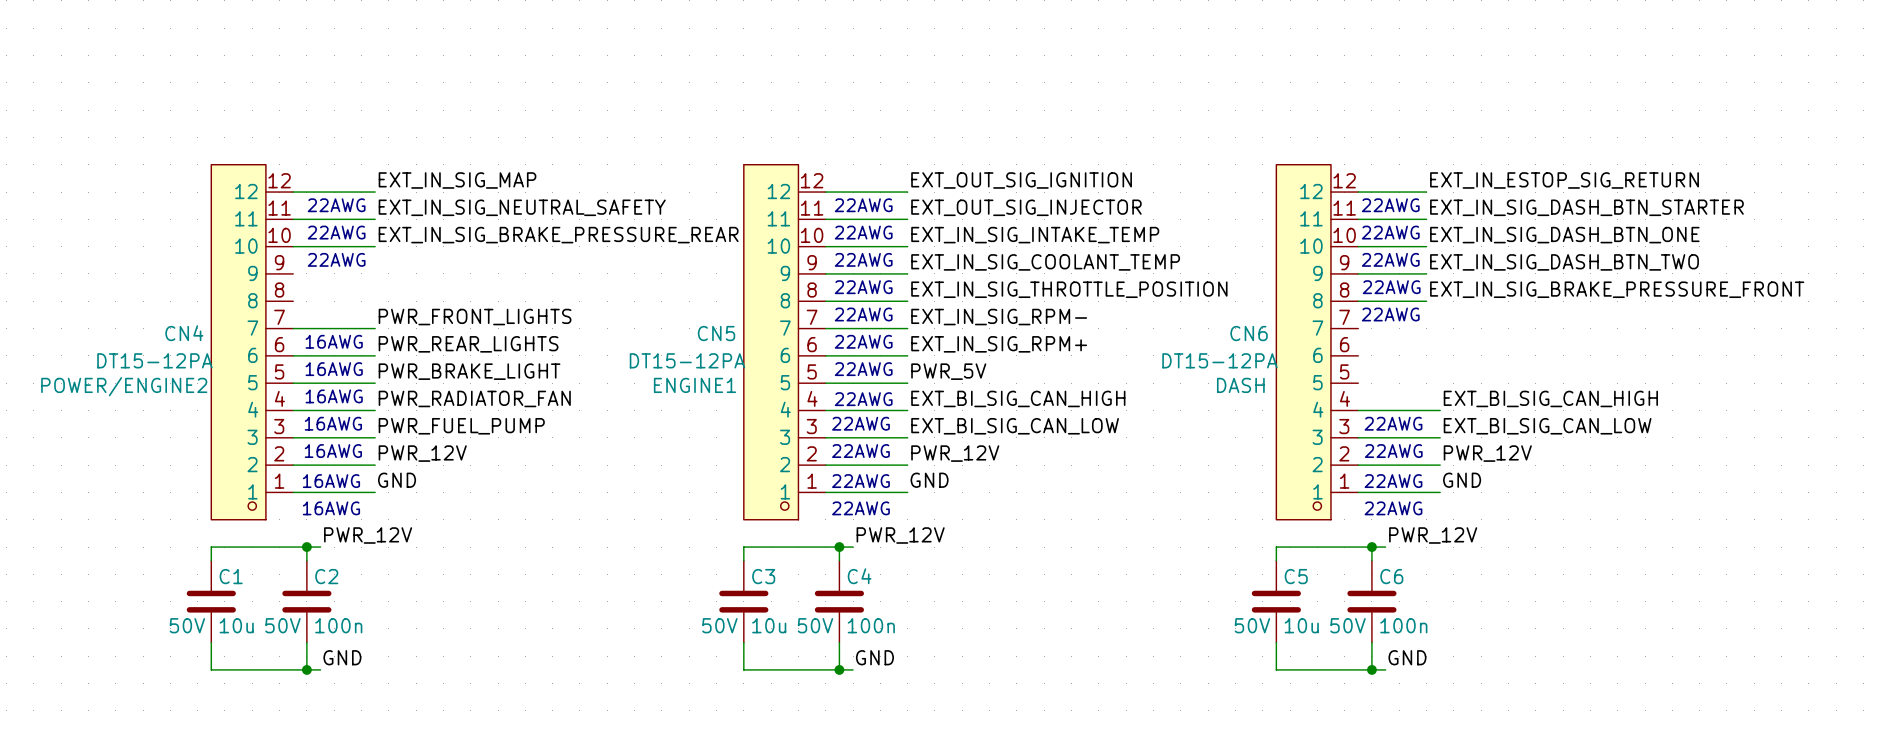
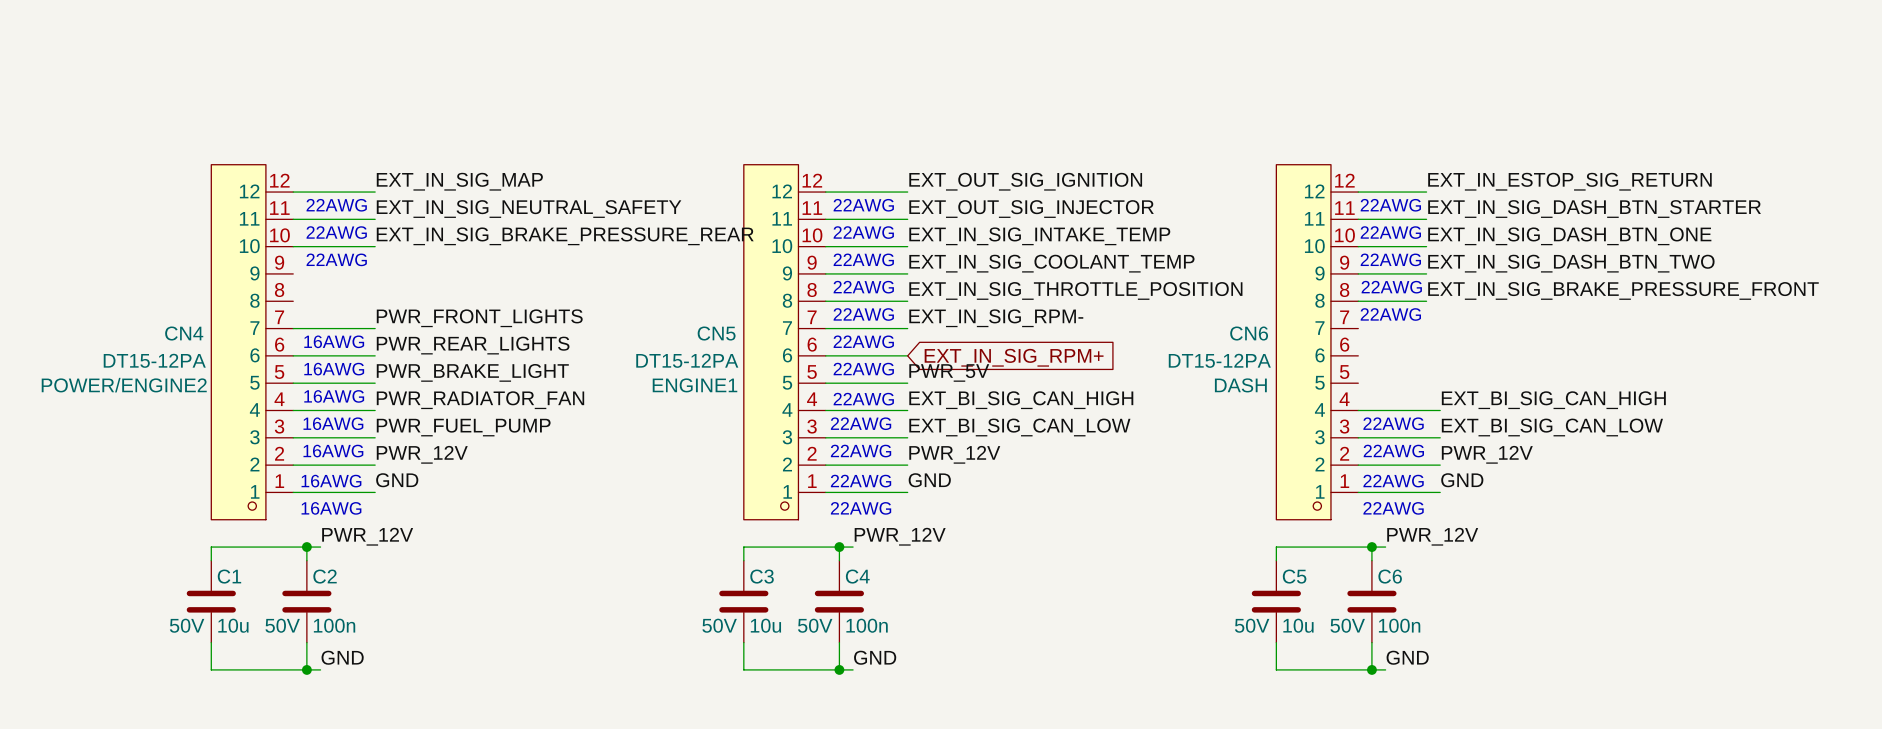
label: EXT_IN_SIG_RPM+ (999, 344) -> none
global label: none -> EXT_IN_SIG_RPM+ (1014, 357)

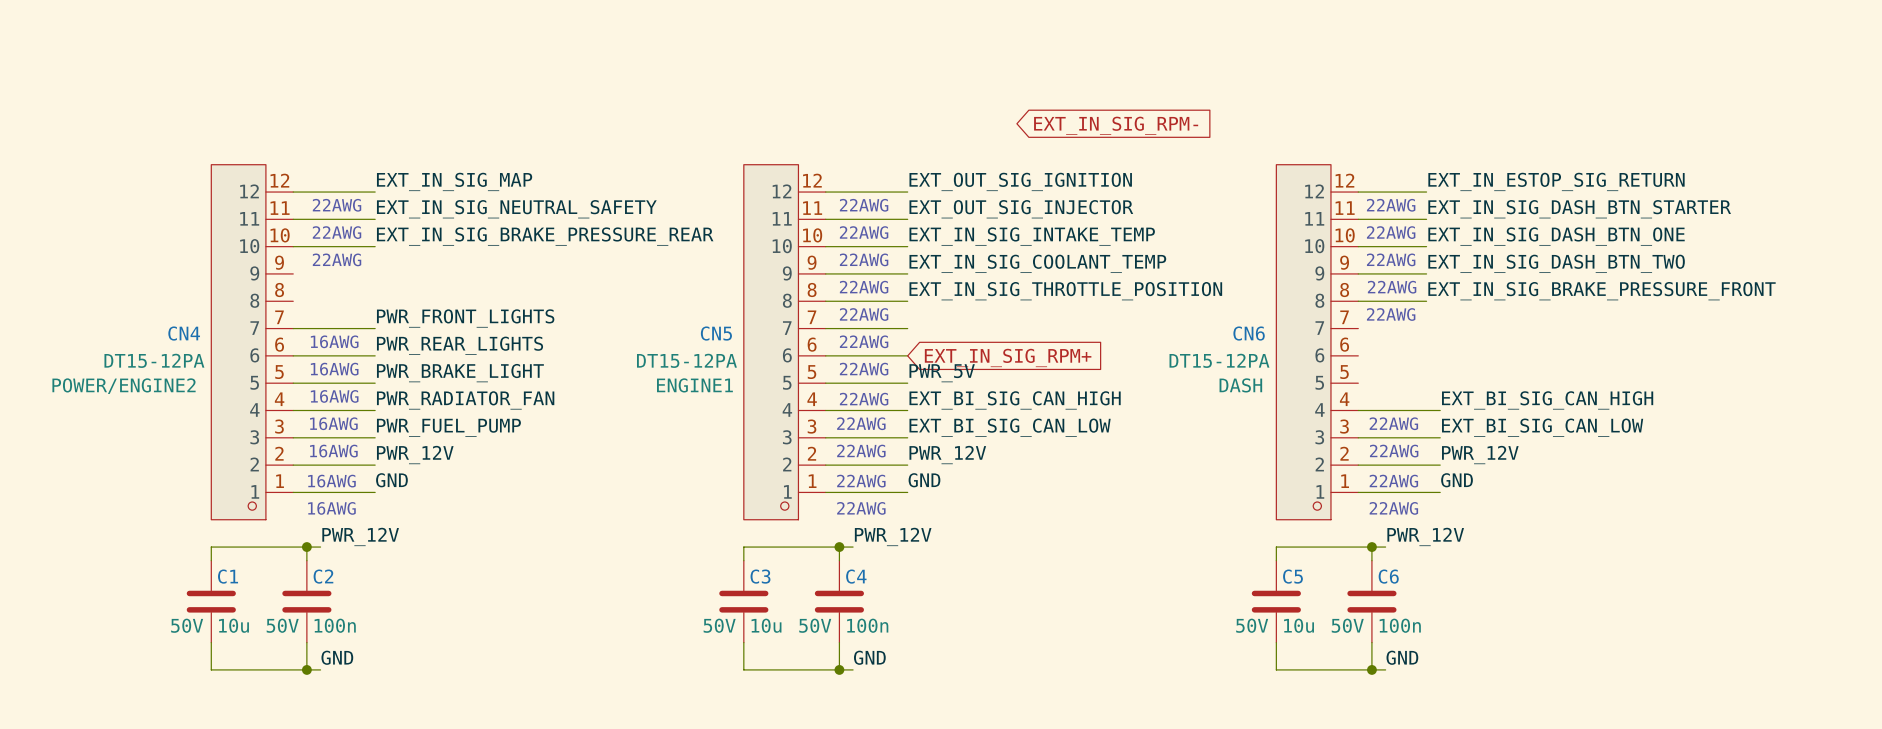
global label: none -> EXT_IN_SIG_RPM- (1116, 125)
label: EXT_IN_SIG_RPM- (996, 318) -> none

